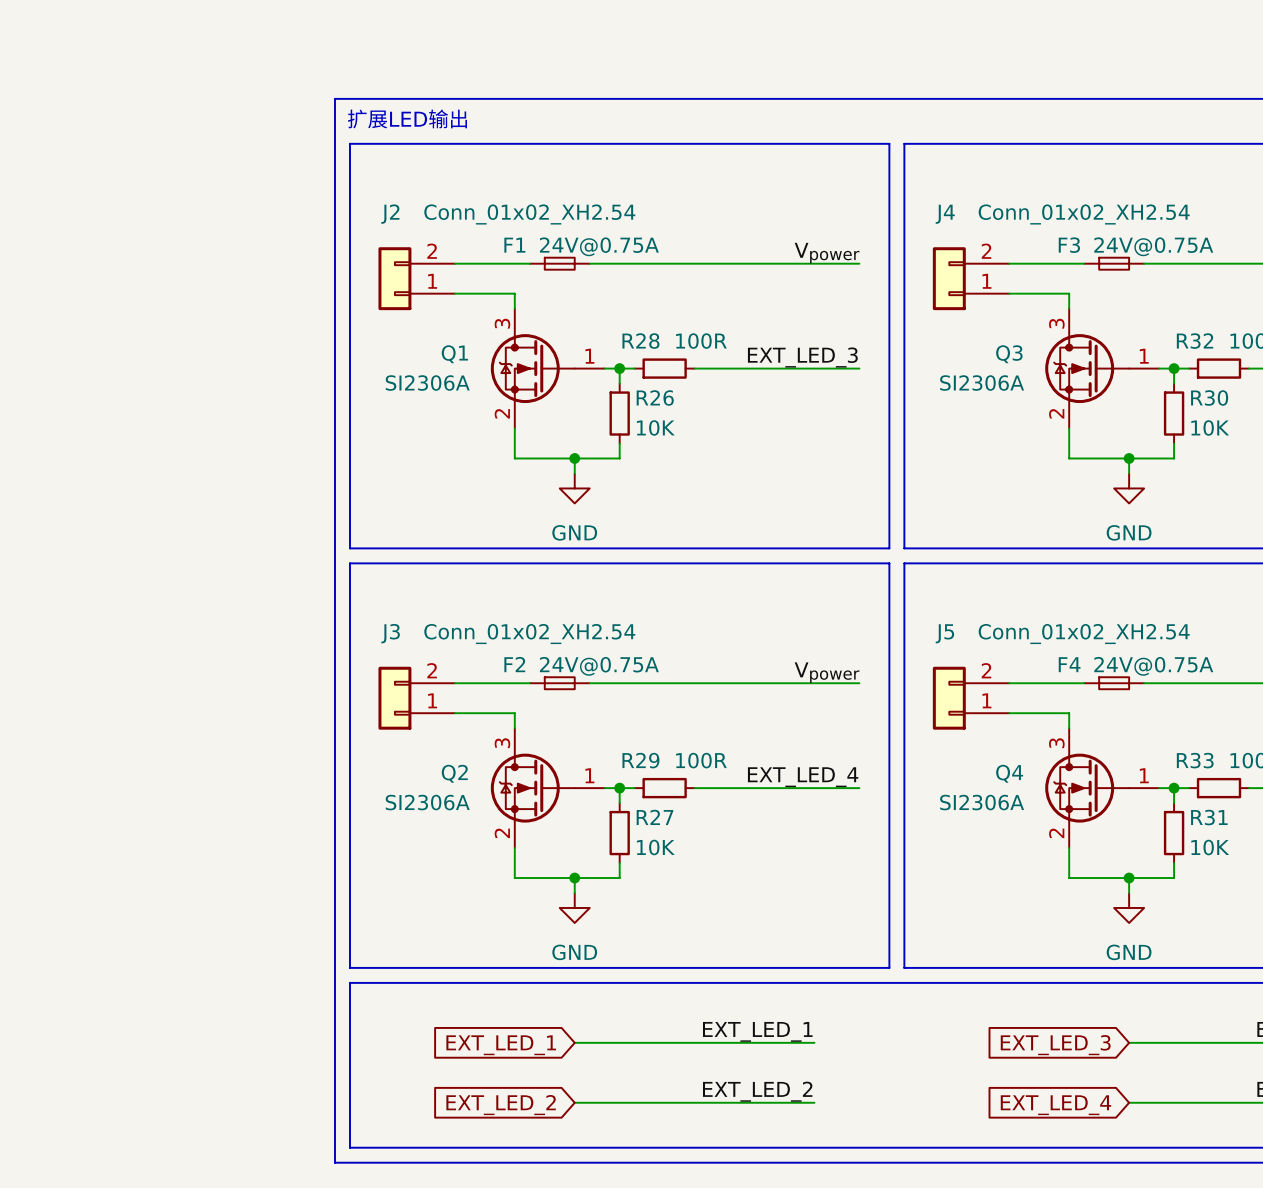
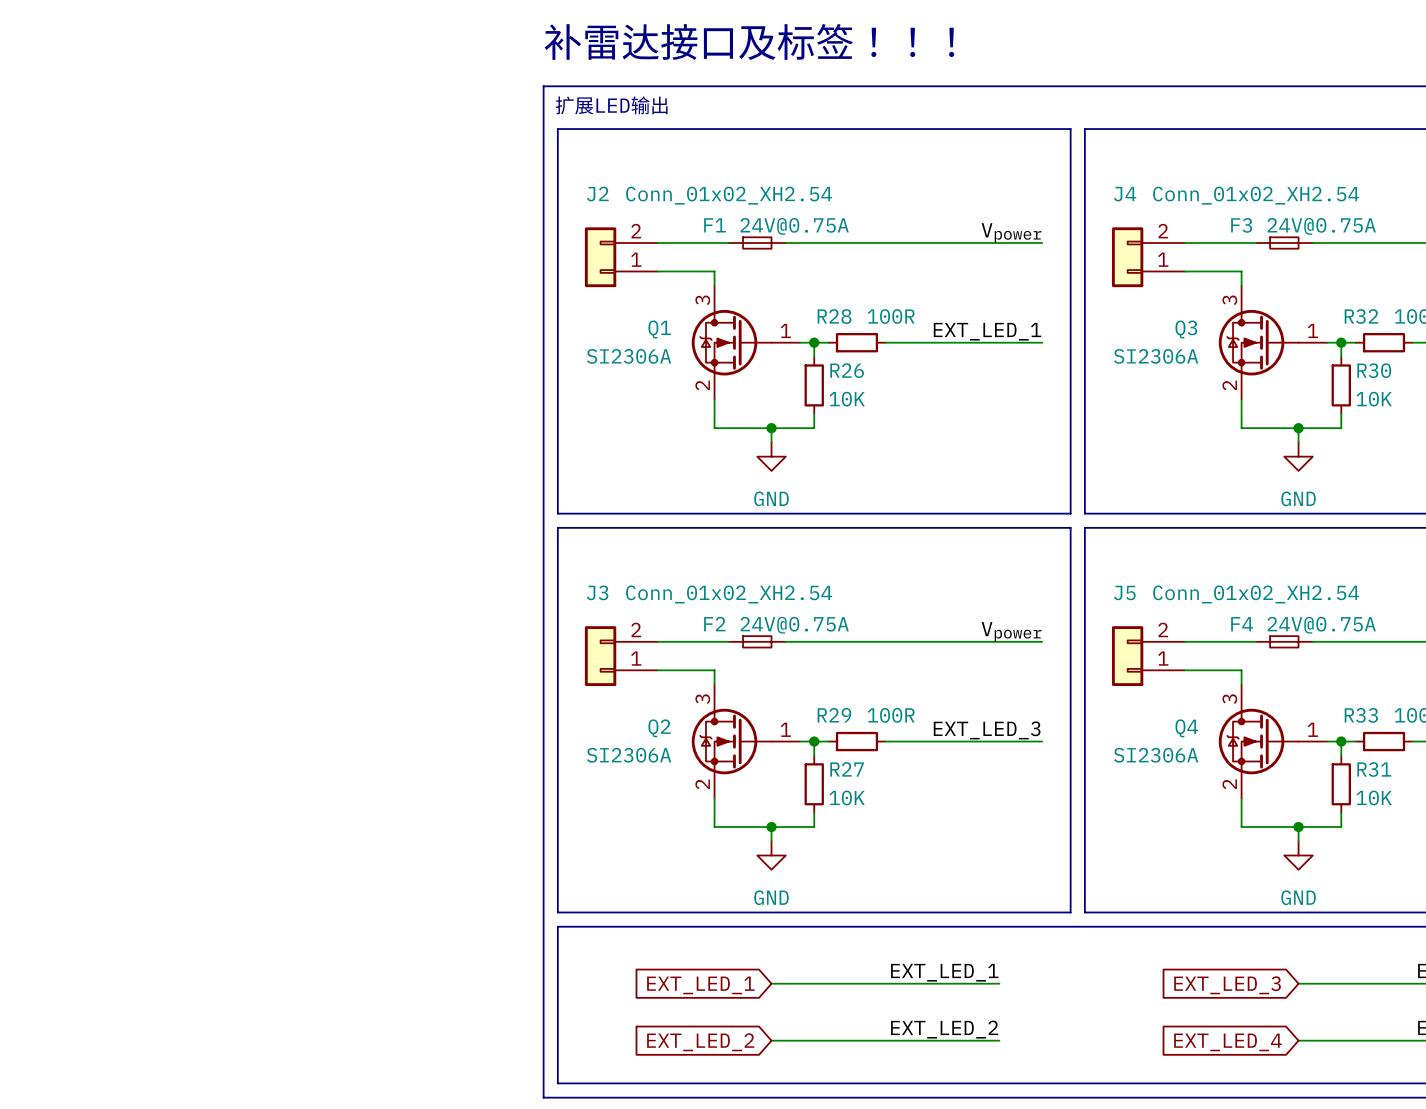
text: none -> 补雷达接口及标签！！！ (749, 41)
label: EXT_LED_3 (802, 357) -> EXT_LED_1 (987, 331)
label: EXT_LED_4 (803, 777) -> EXT_LED_3 (987, 730)

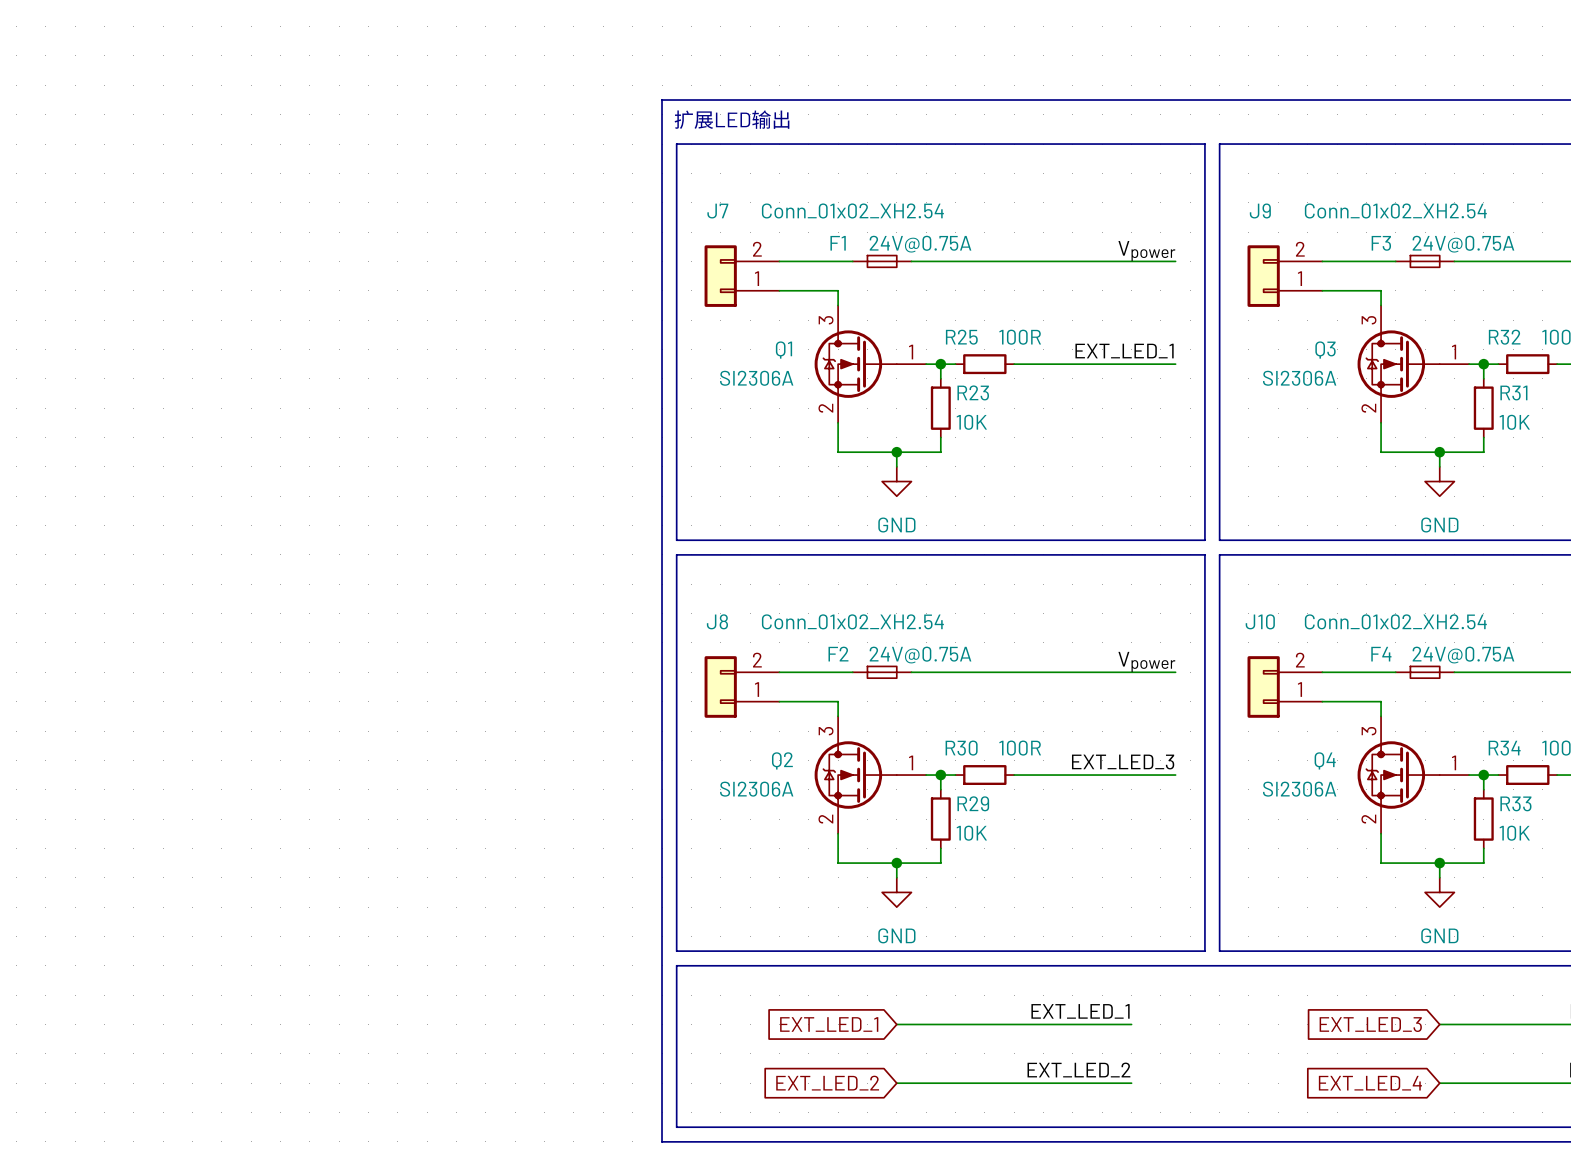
text: 补雷达接口及标签！！！ (749, 41) -> none
J2 name: J2 (597, 194) -> J7 (717, 211)
J4 name: J4 (1125, 194) -> J9 (1260, 210)
R28 name: R28 (834, 316) -> R25 (961, 337)
R26 name: R26 (847, 370) -> R23 (973, 392)
R30 name: R30 (1374, 370) -> R31 (1513, 393)
J3 name: J3 (597, 592) -> J8 (717, 621)
J5 name: J5 (1124, 592) -> J10 (1260, 621)
R29 name: R29 (834, 715) -> R30 (961, 748)
R33 name: R33 (1361, 715) -> R34 (1504, 748)
R27 name: R27 (847, 769) -> R29 (973, 803)
R31 name: R31 (1374, 769) -> R33 (1515, 803)

